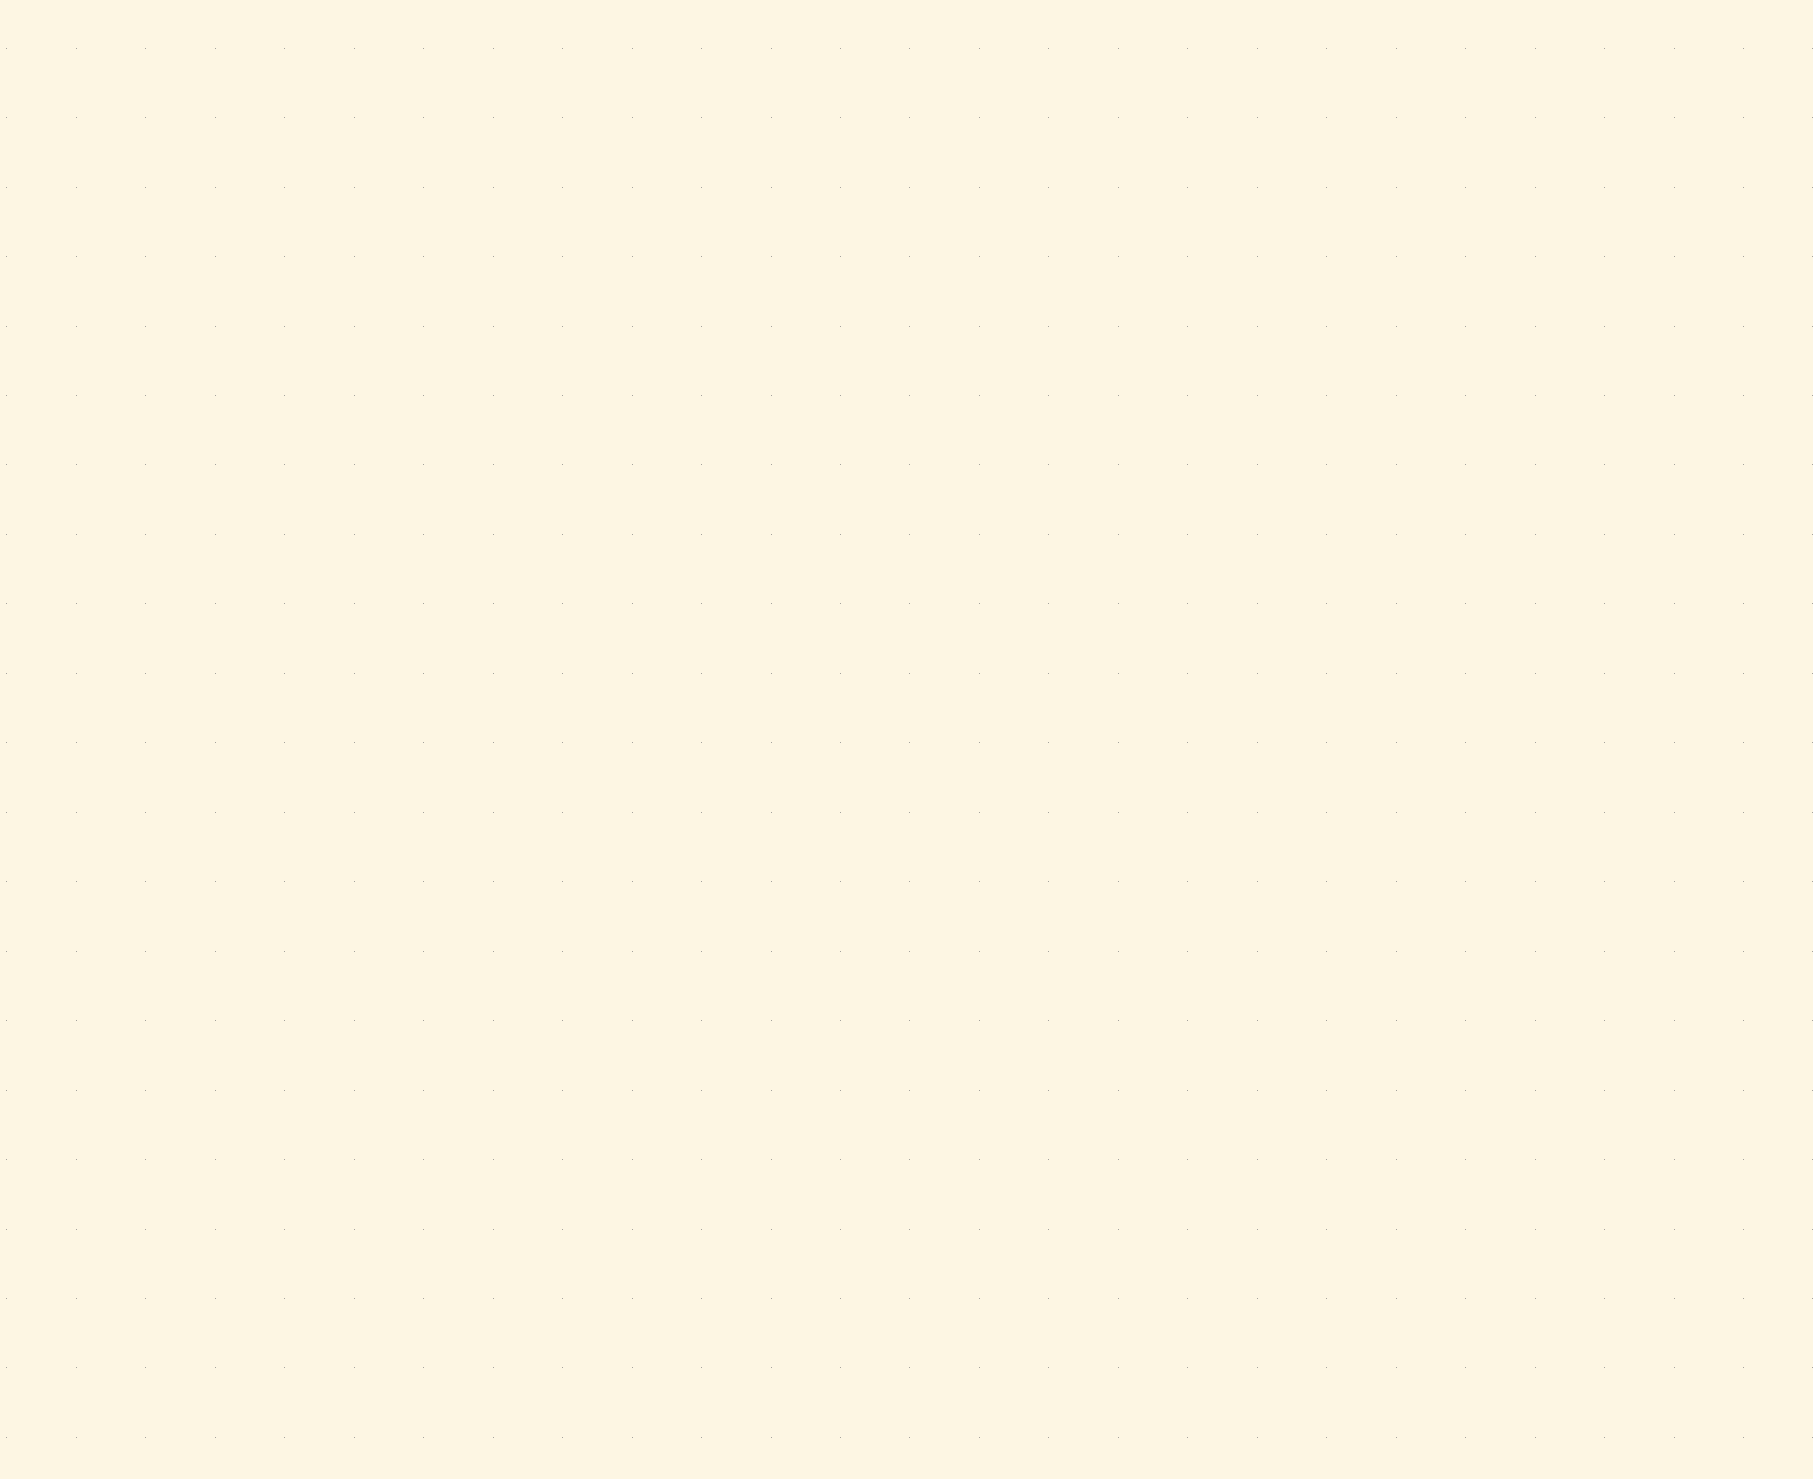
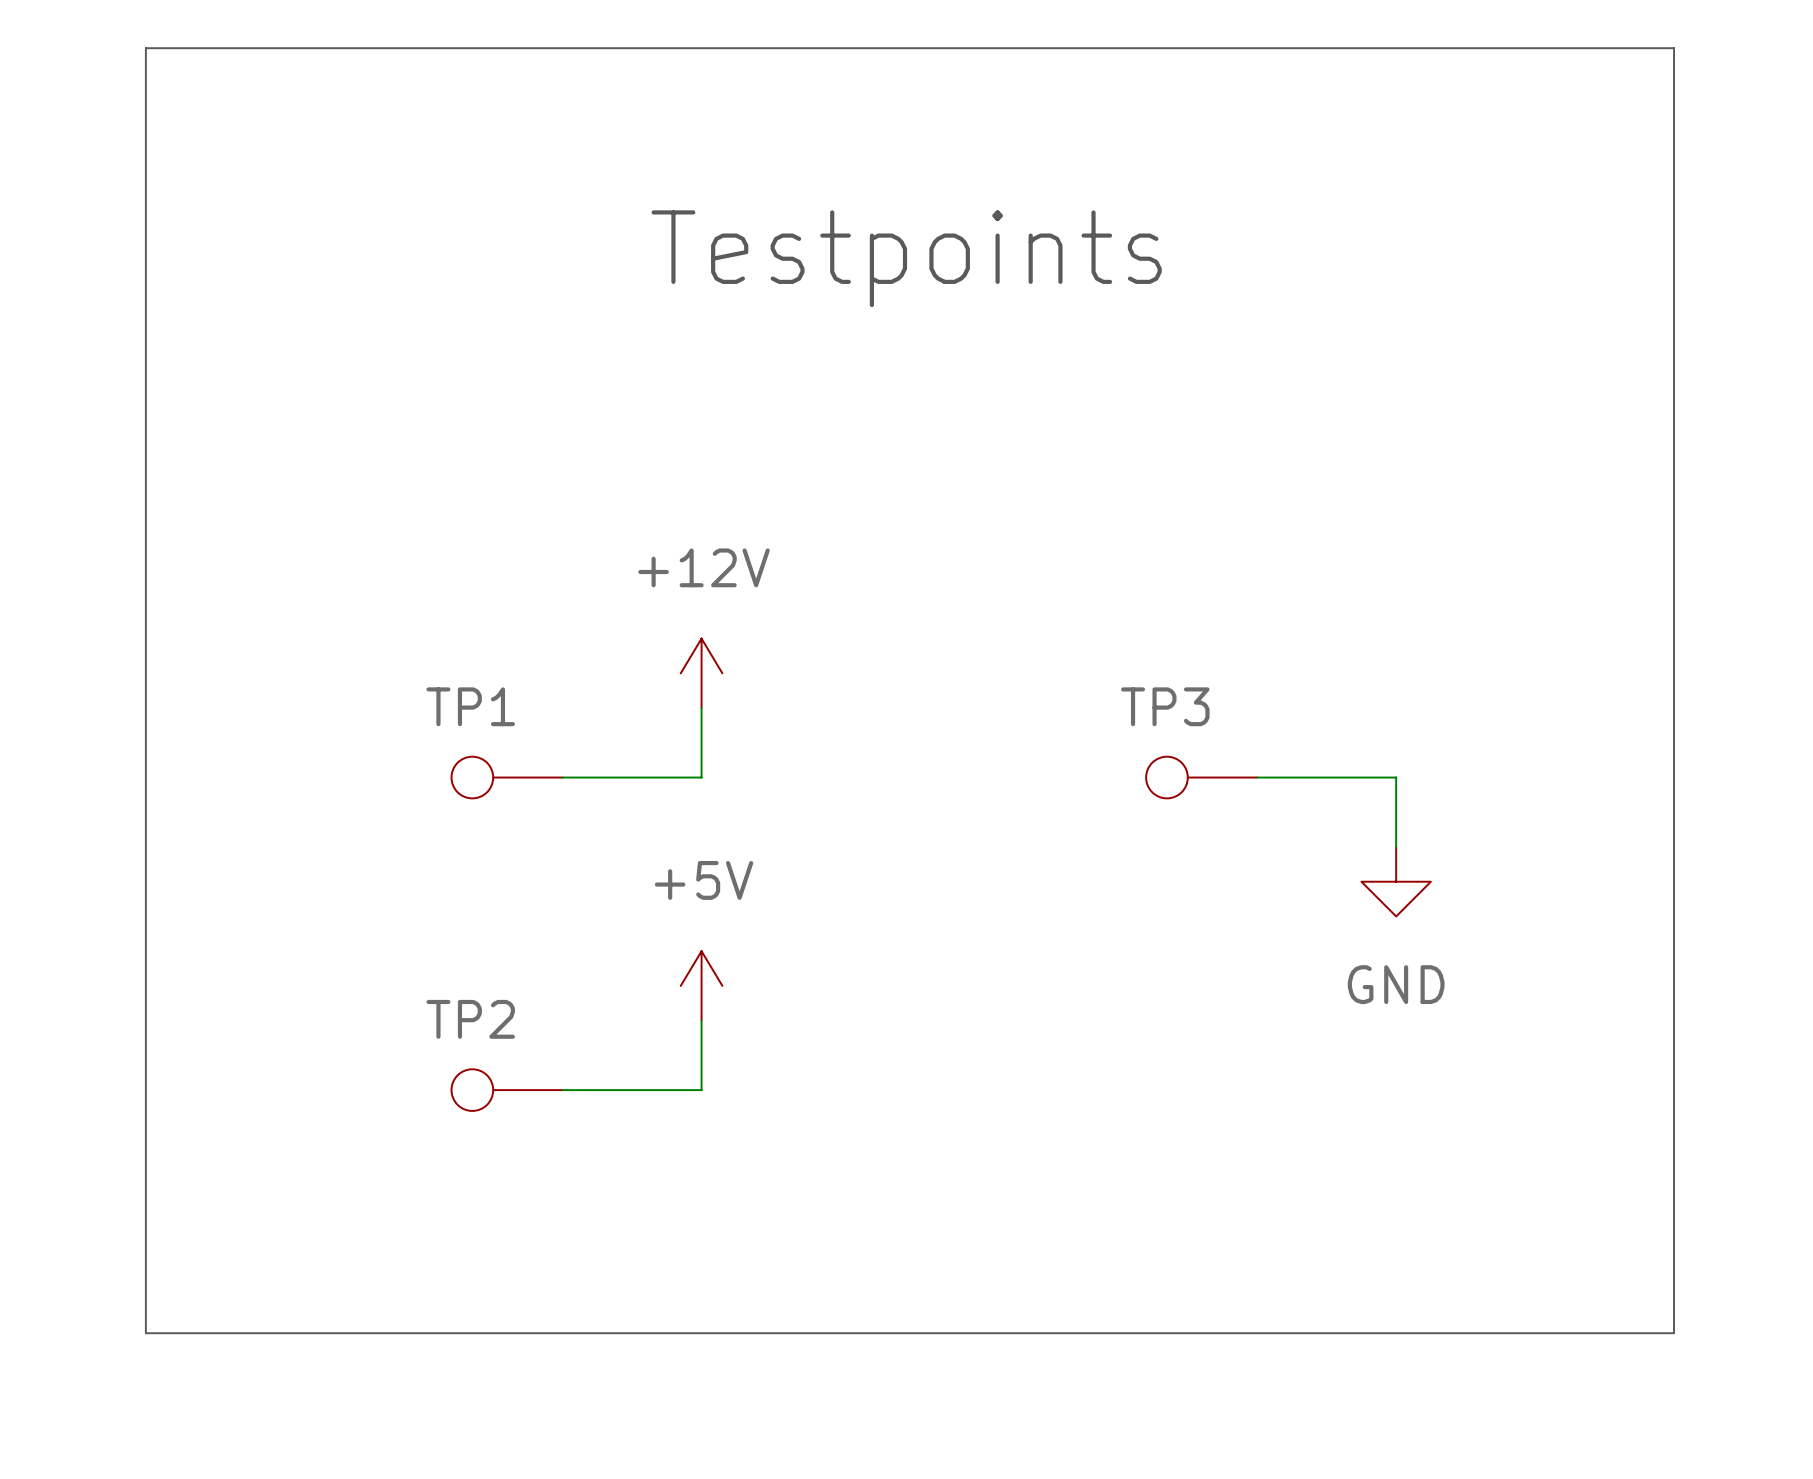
line: none -> (145, 48) (1674, 48) (1674, 1333) (145, 1333) (145, 48)
text: none -> Testpoints (906, 258)
power symbol: none -> +12V (701, 673)
wire: none -> (701, 708) (701, 777) (562, 777)
TP1: none -> (507, 777)
TP3: none -> (1201, 777)
wire: none -> (1257, 777) (1396, 777) (1396, 846)
power symbol: none -> GND (1396, 881)
power symbol: none -> +5V (701, 985)
wire: none -> (701, 1020) (701, 1090) (562, 1090)
TP2: none -> (507, 1090)

